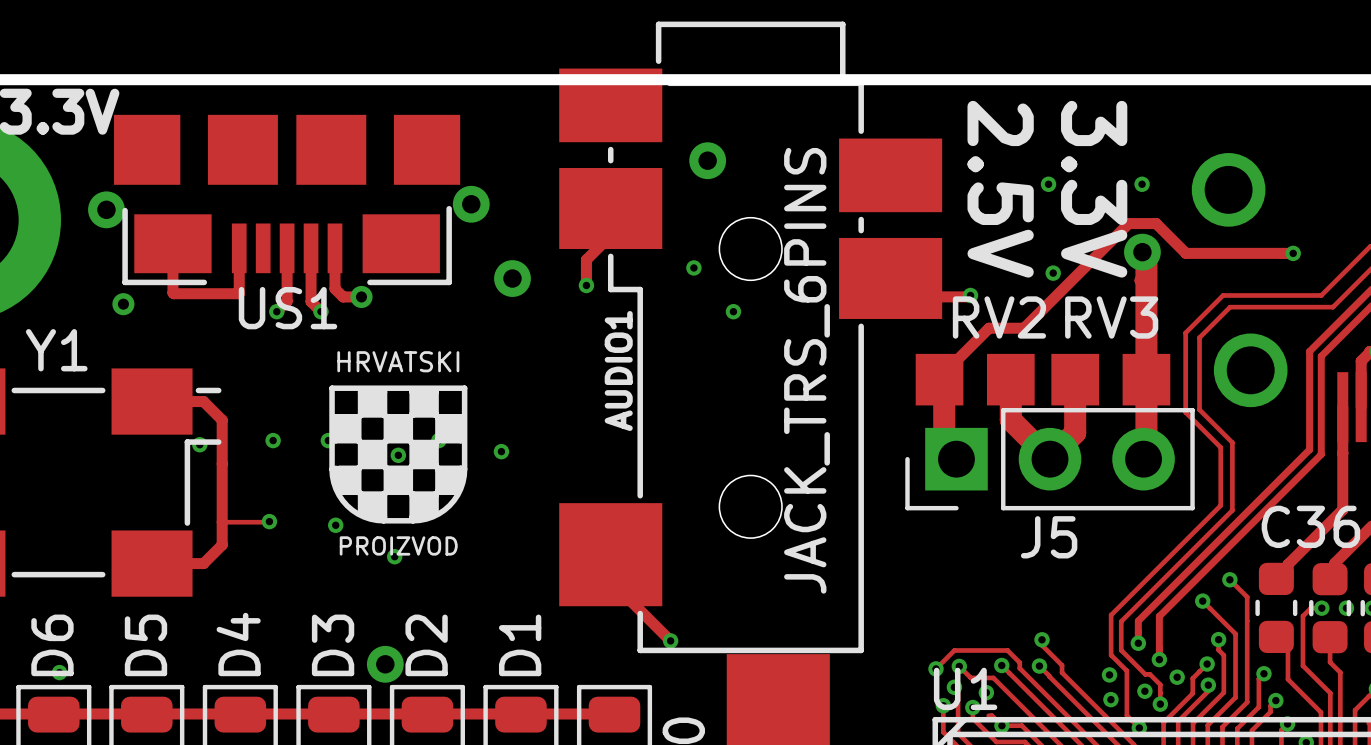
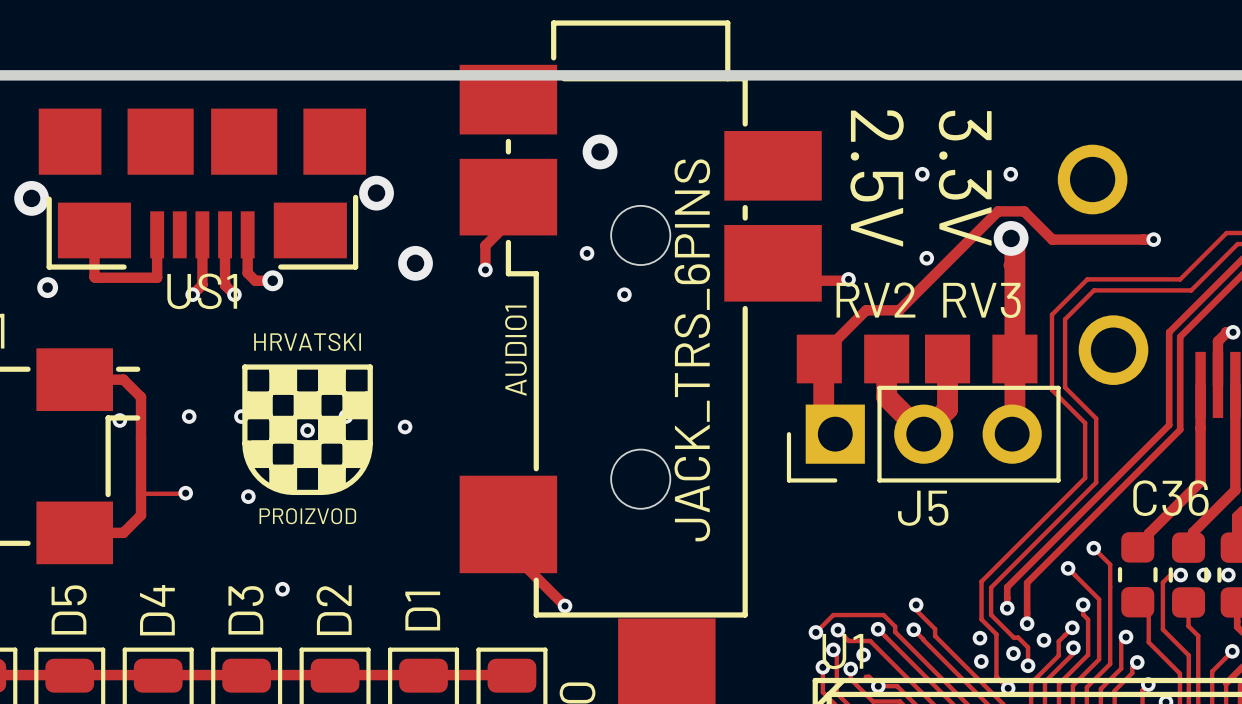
via position: (394, 556) -> (282, 589)
via: (385, 664) -> none

